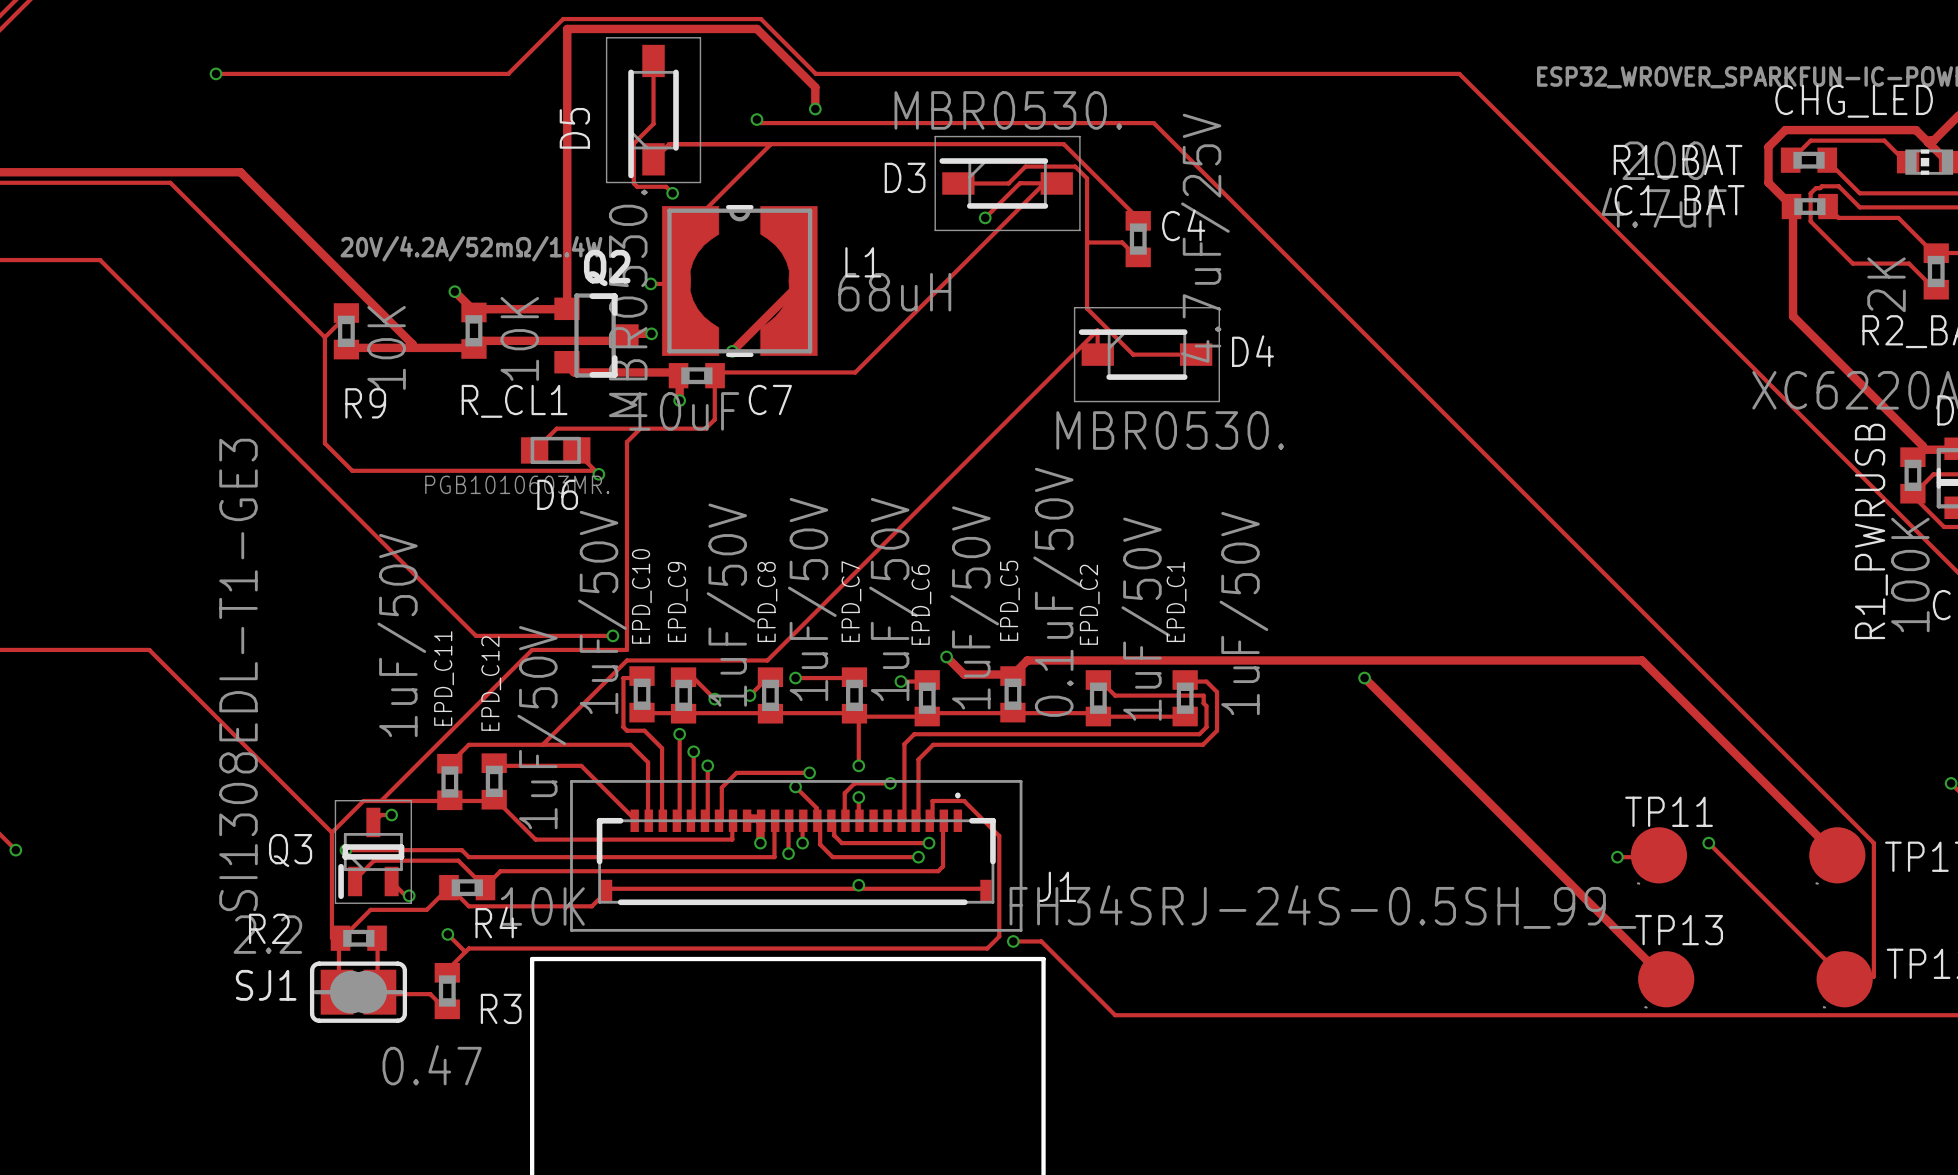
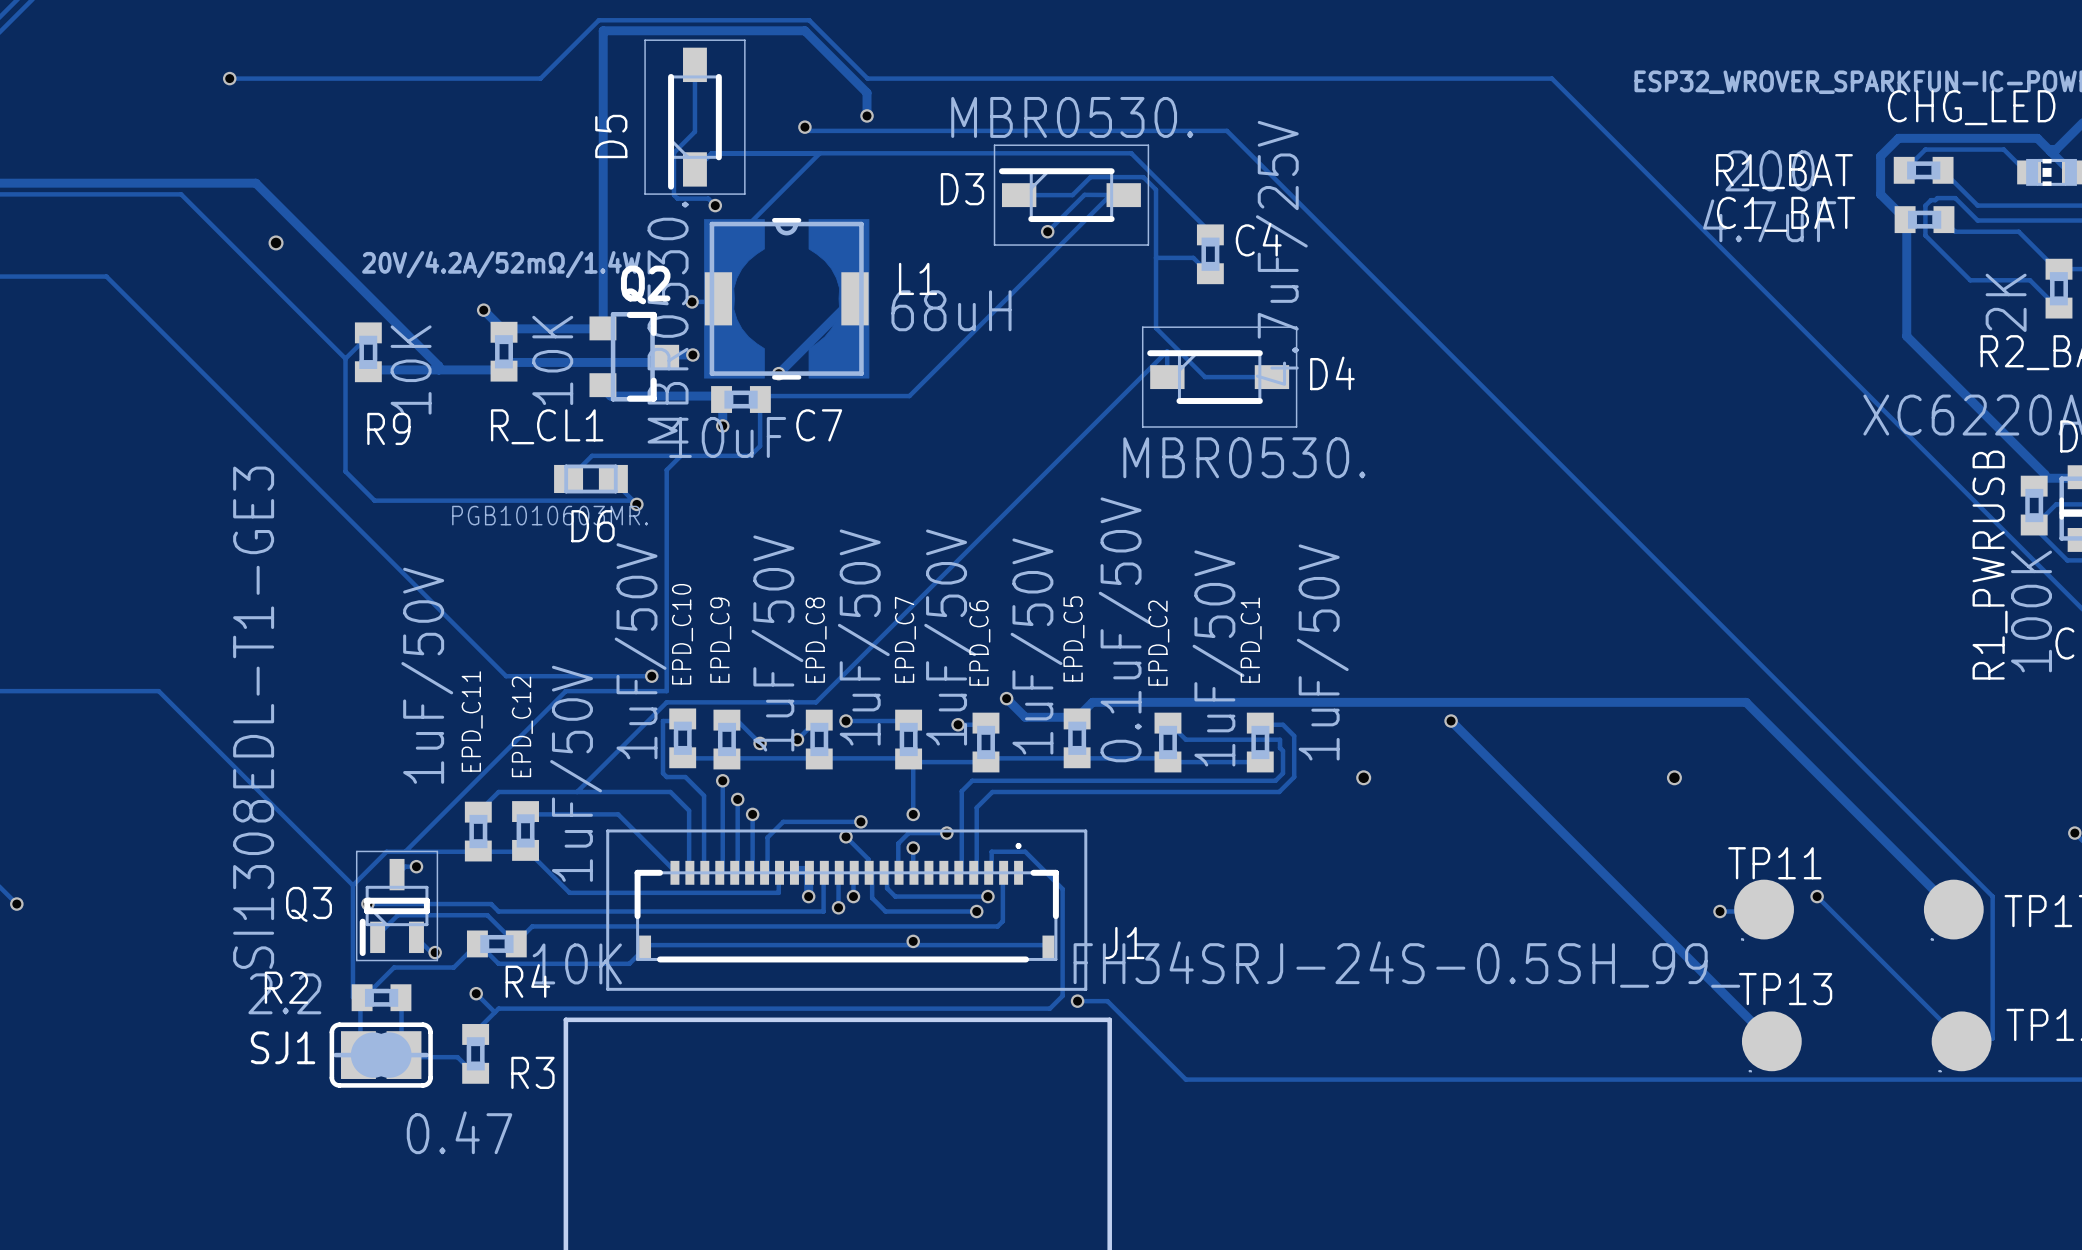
via: none -> (276, 242)
via: none -> (1363, 777)
via: none -> (1674, 777)

